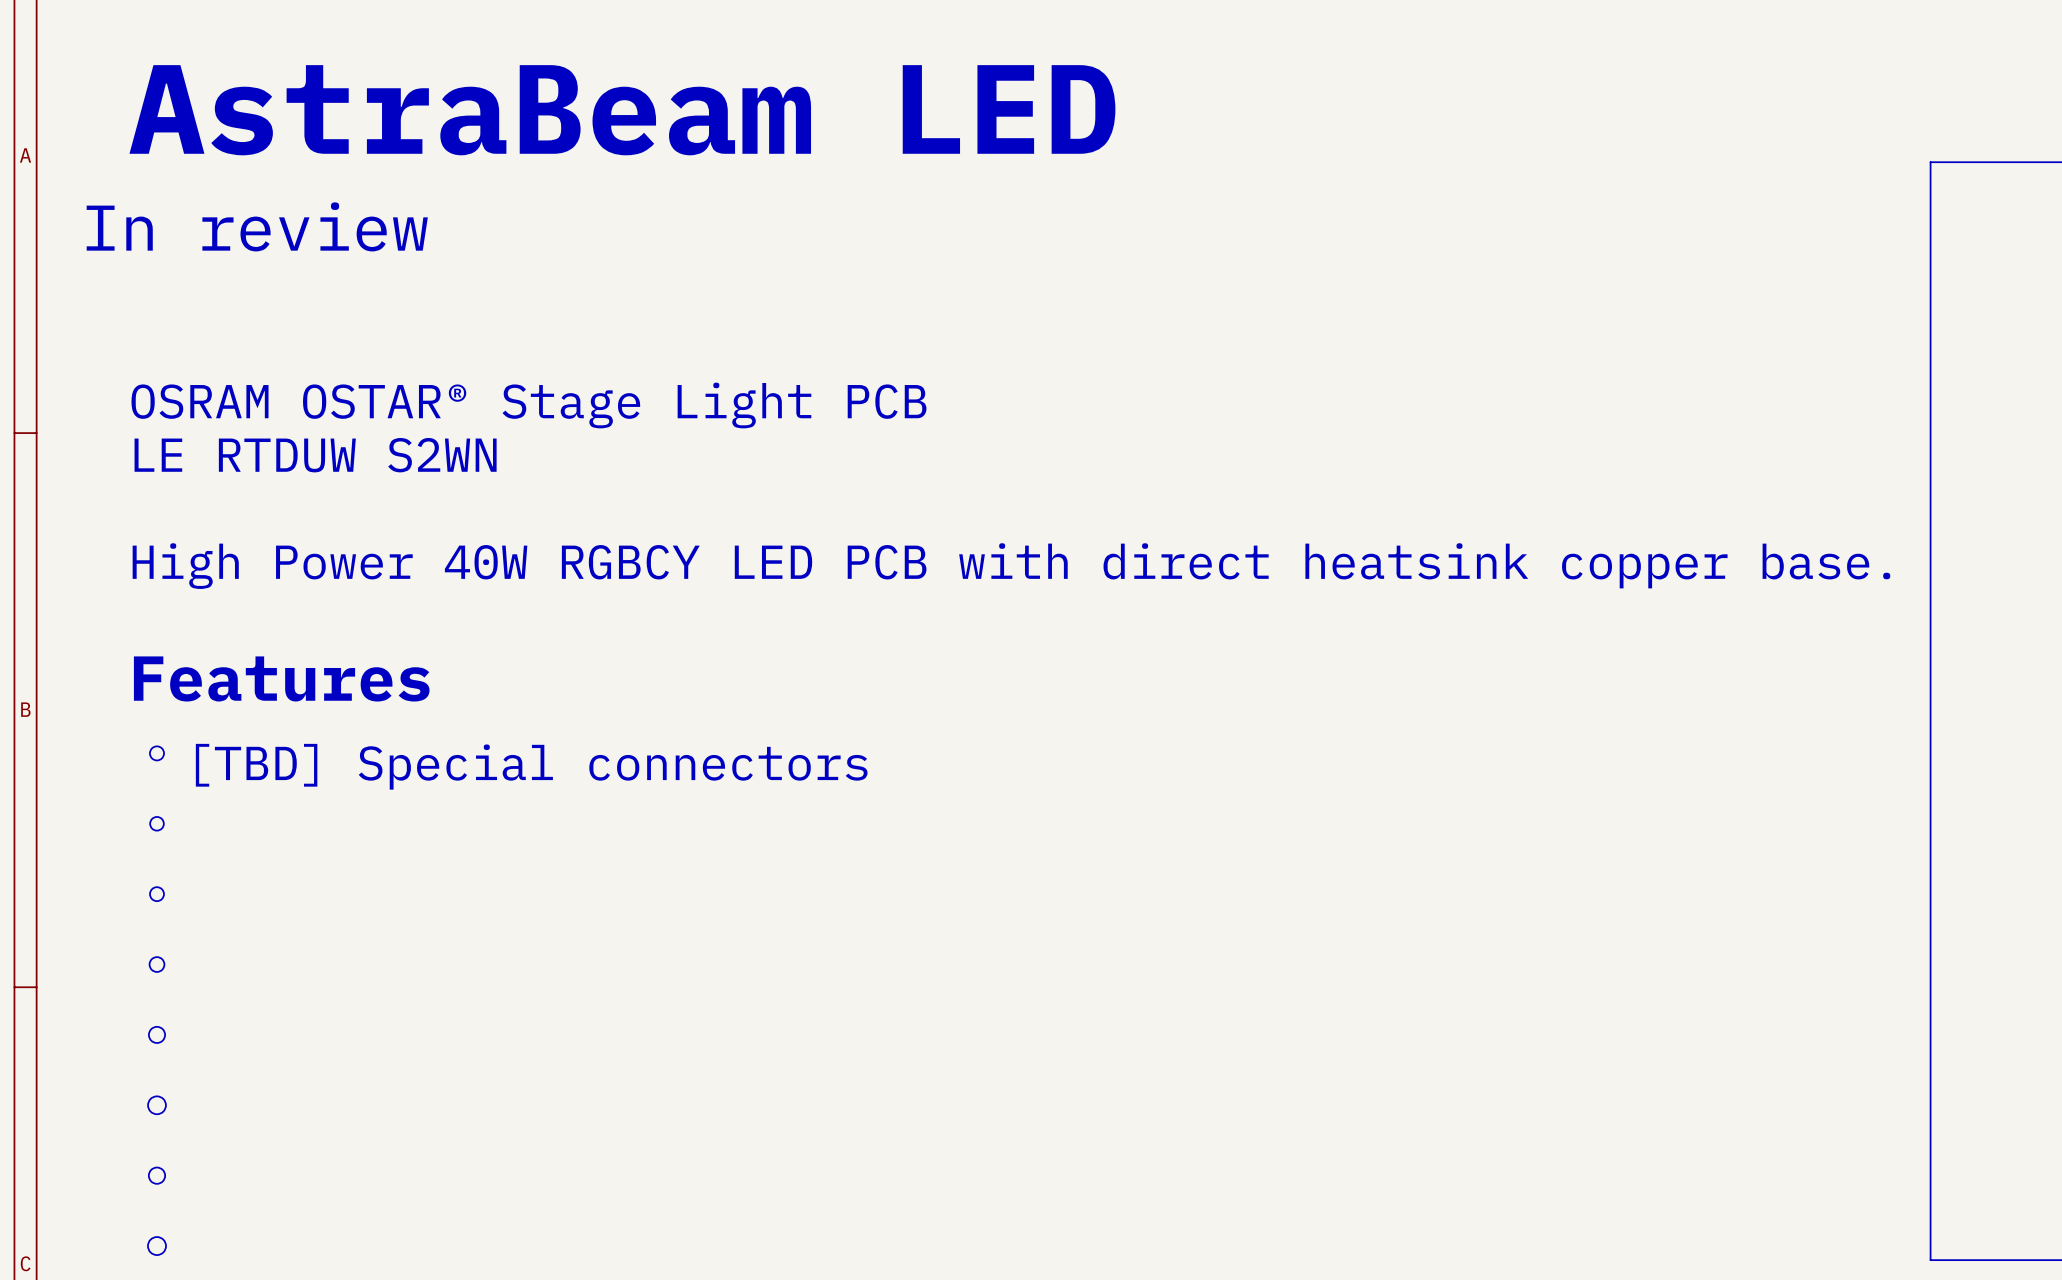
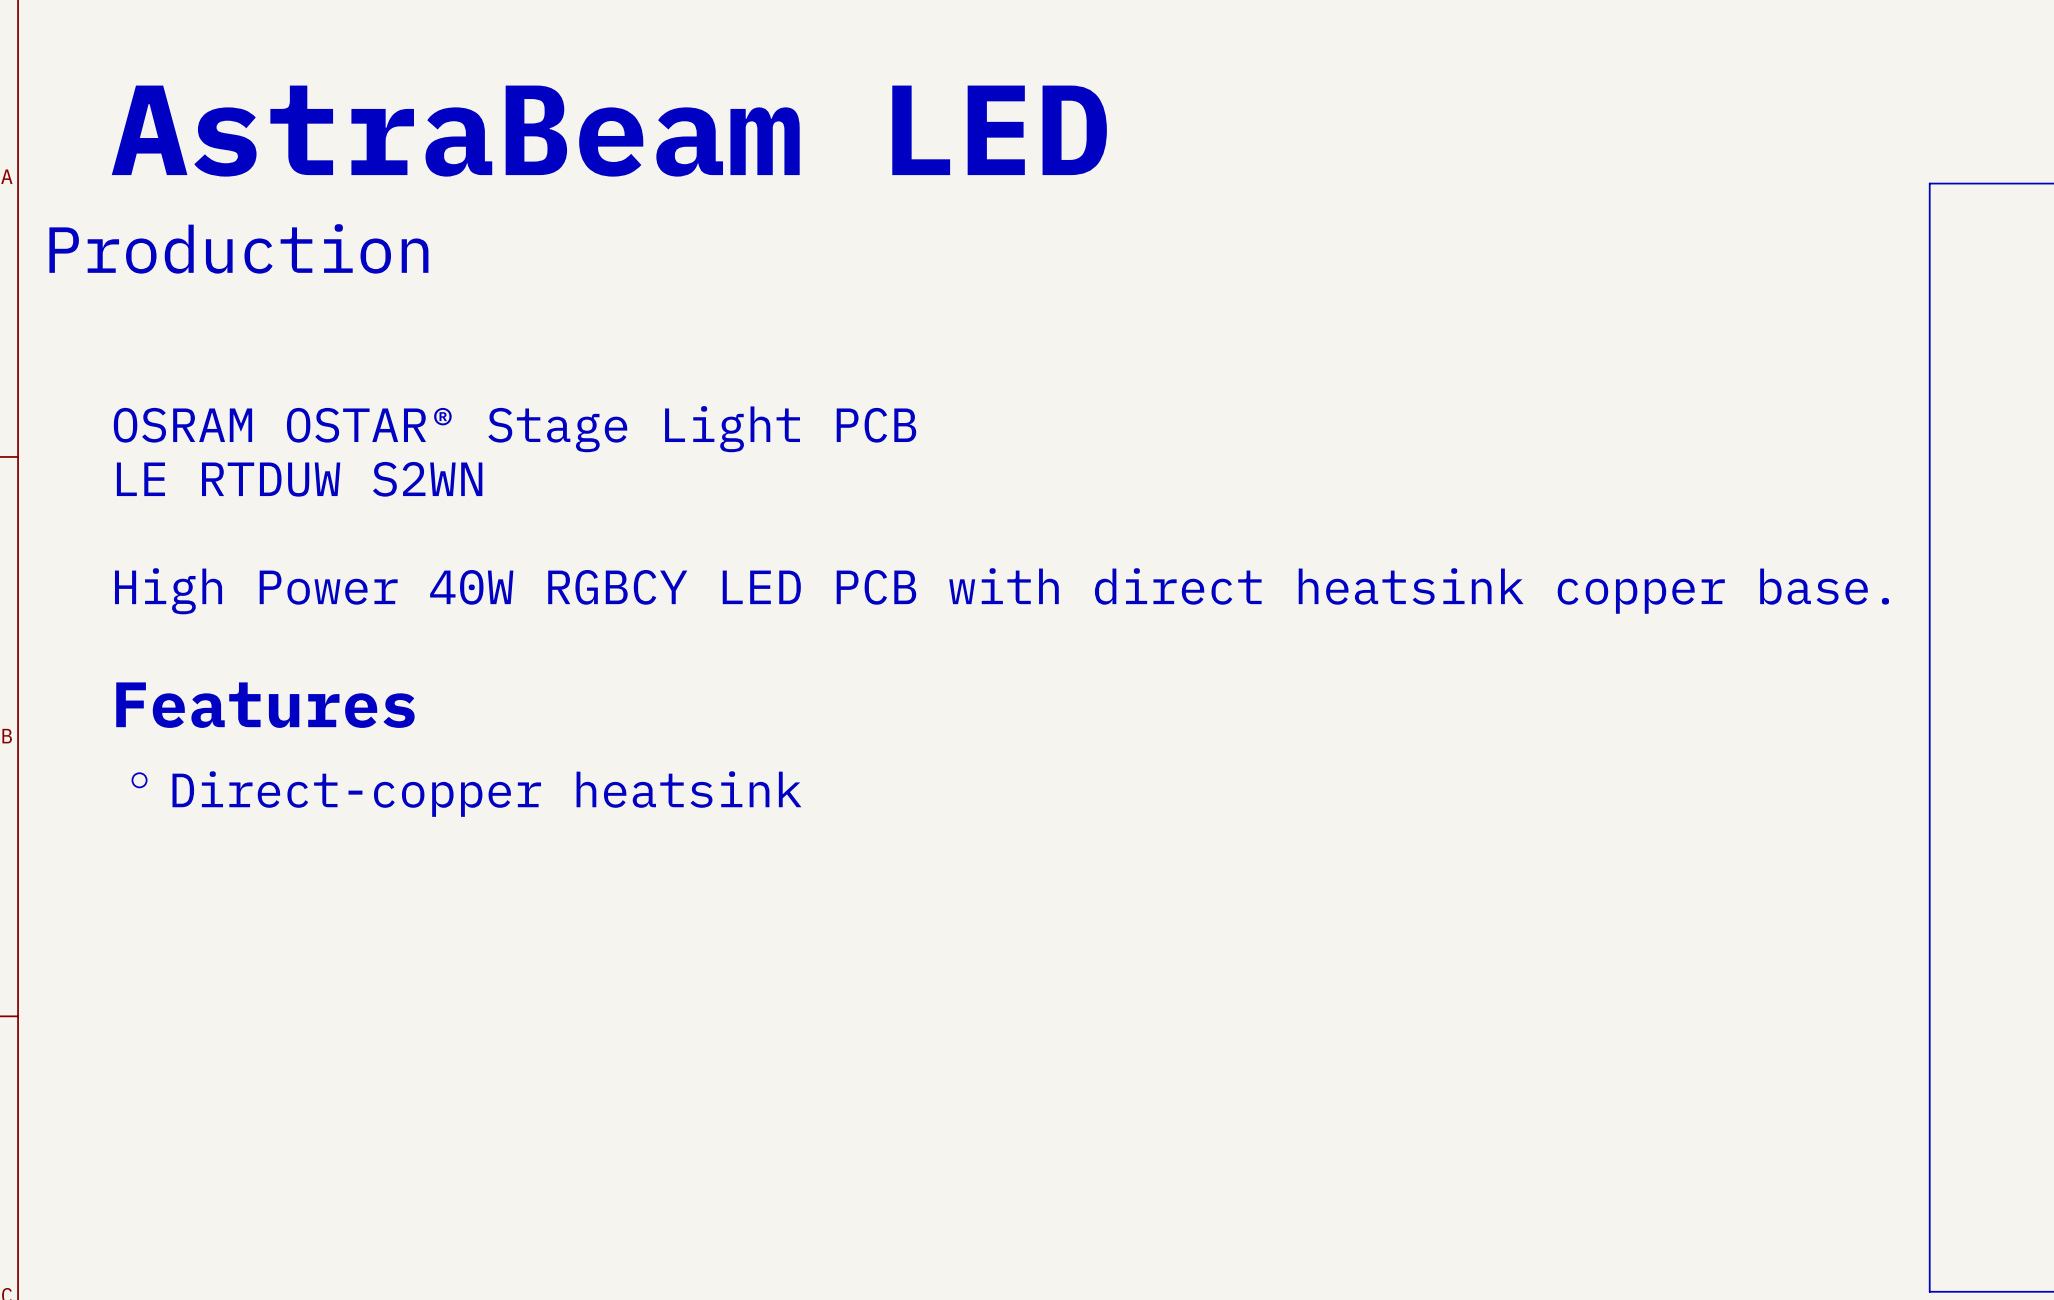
text: In review (257, 226) -> Production (238, 248)
text: [TBD] Special connectors (531, 766) -> Direct-copper heatsink (486, 794)
drawing: [150, 816, 164, 831] -> none
drawing: [150, 887, 164, 902] -> none
drawing: [149, 957, 165, 972] -> none
drawing: [148, 1026, 166, 1044] -> none
drawing: [148, 1096, 166, 1115] -> none
drawing: [148, 1167, 166, 1184] -> none
drawing: [147, 1237, 167, 1256] -> none

